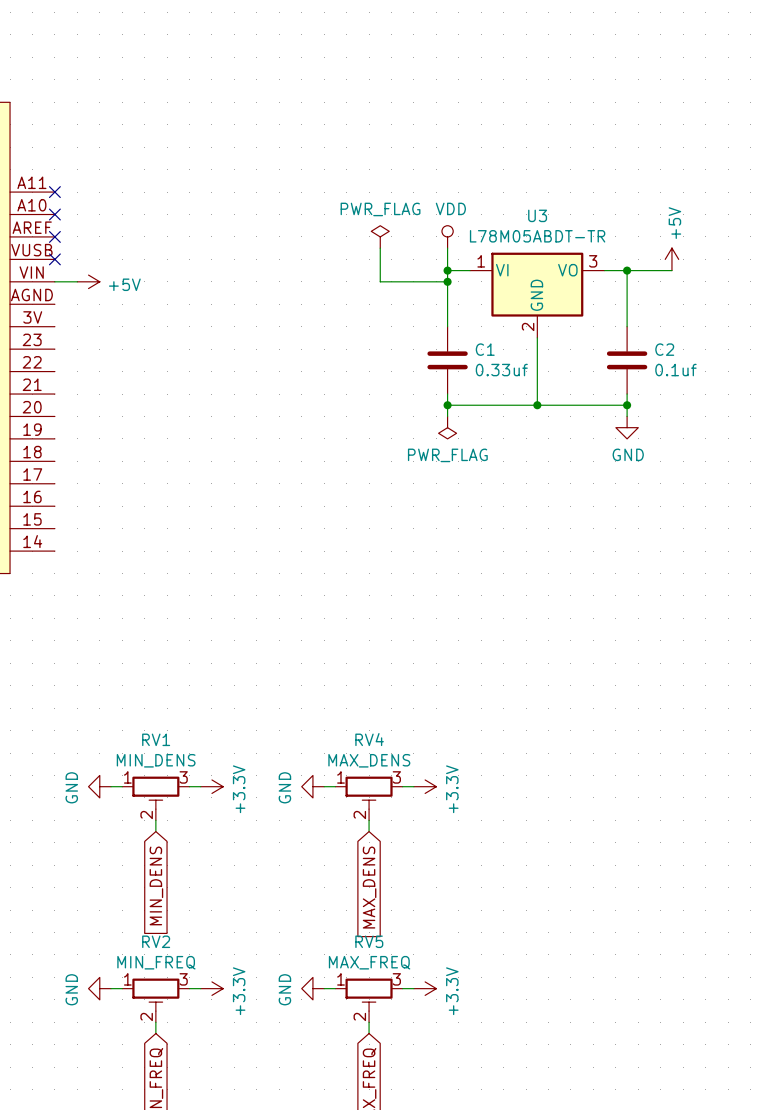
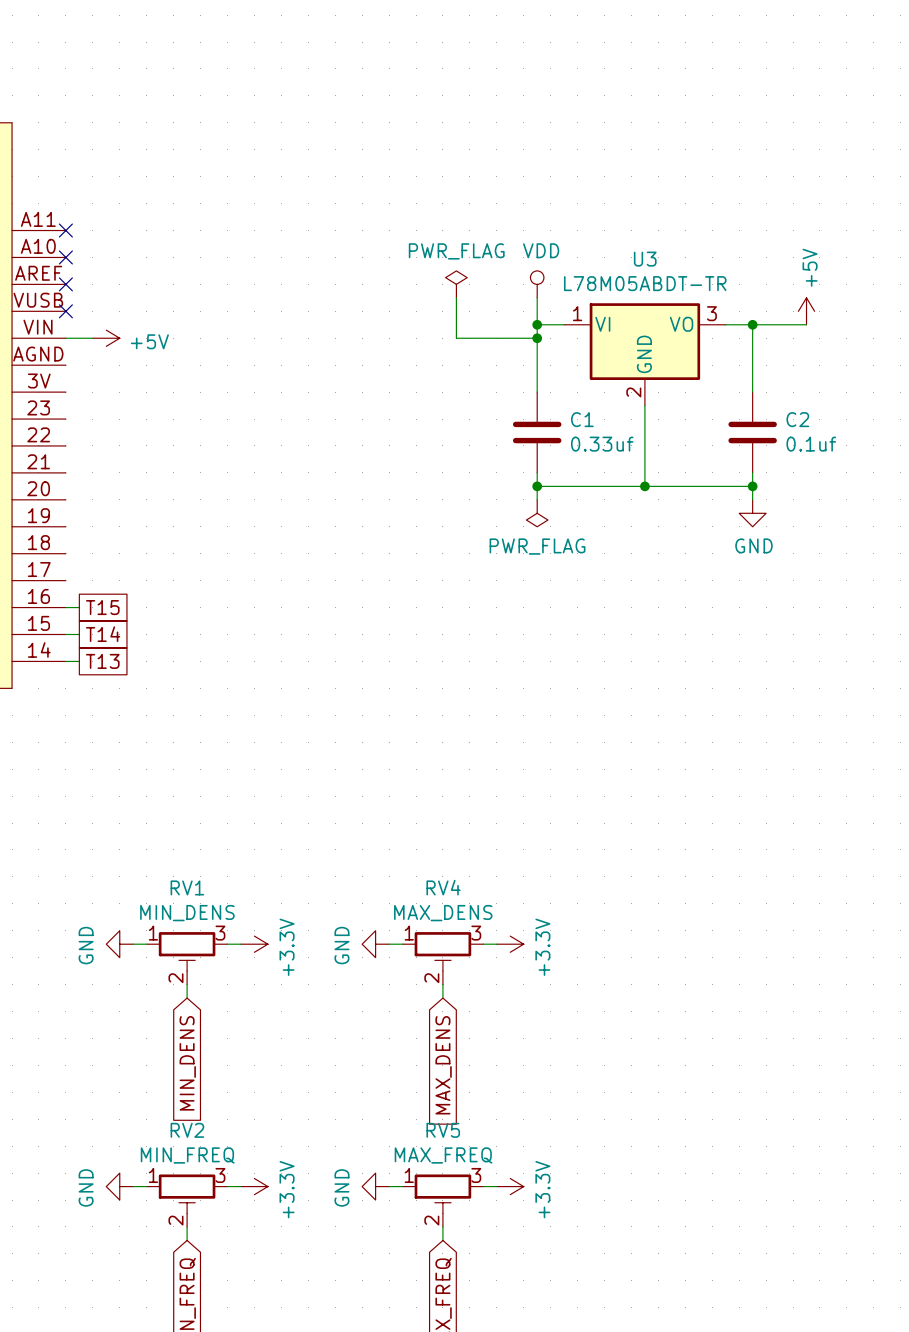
wire: none -> (65, 607) (79, 607)
global label: none -> T15 (102, 607)
wire: none -> (65, 634) (79, 634)
global label: none -> T14 (103, 634)
wire: none -> (65, 661) (79, 661)
global label: none -> T13 (102, 661)

